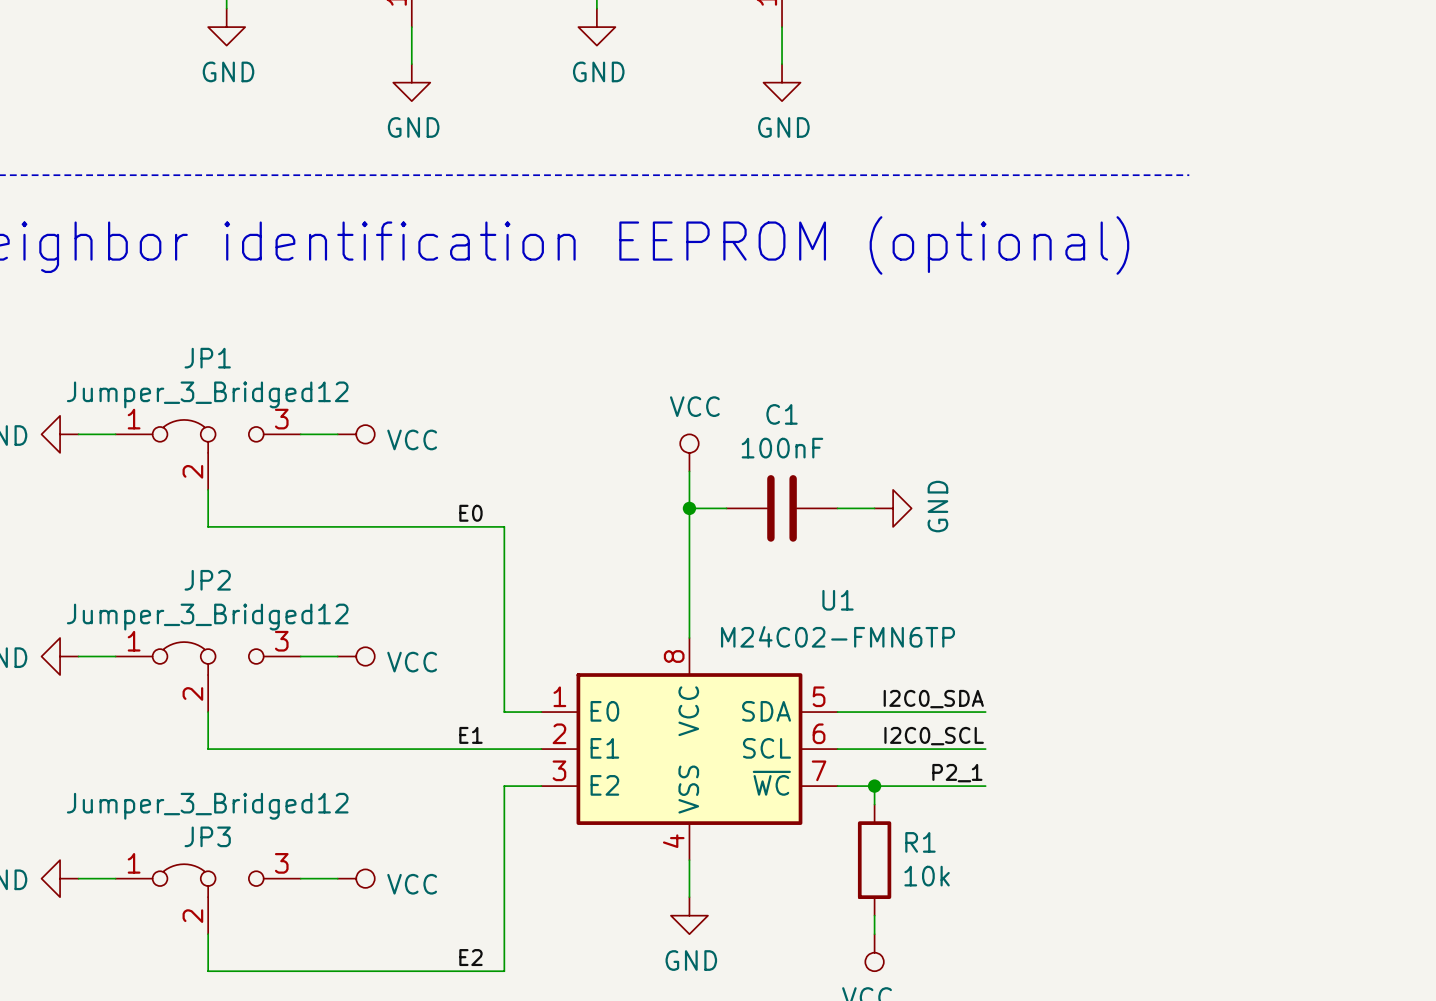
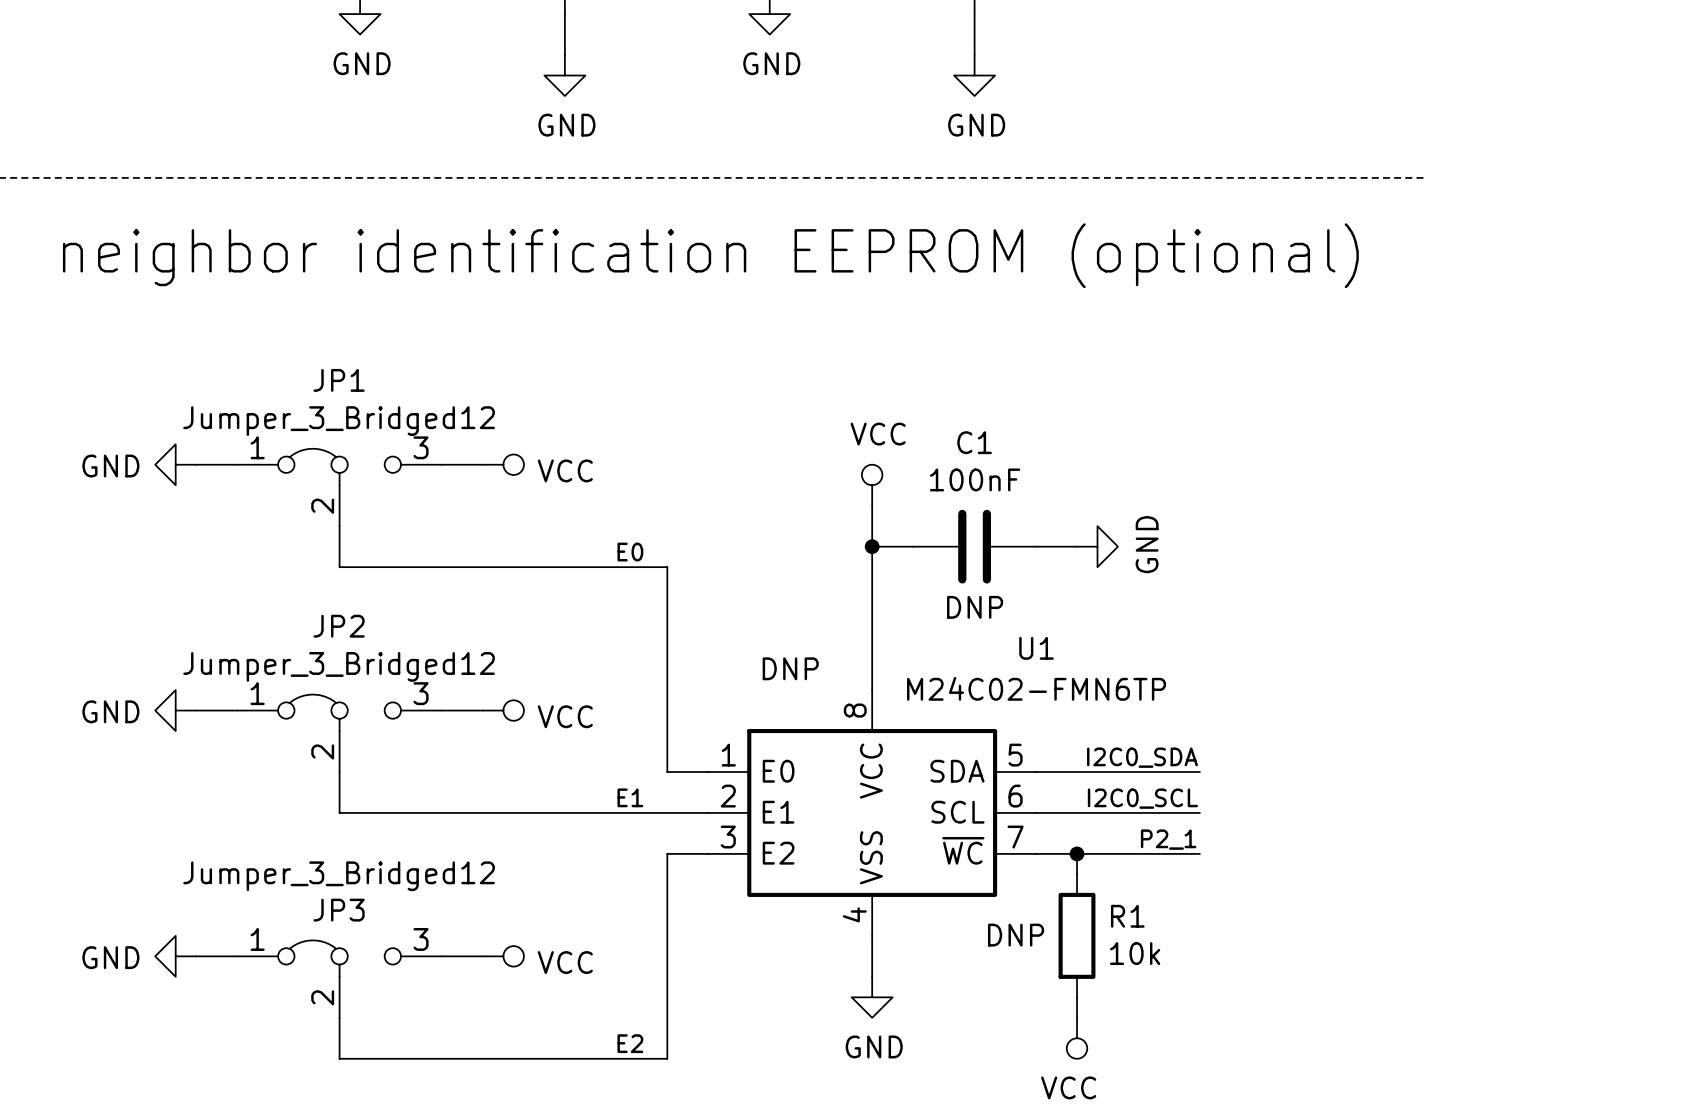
C1 text: none -> DNP (975, 607)
U1 text: none -> DNP (790, 668)
R1 text: none -> DNP (1016, 935)

